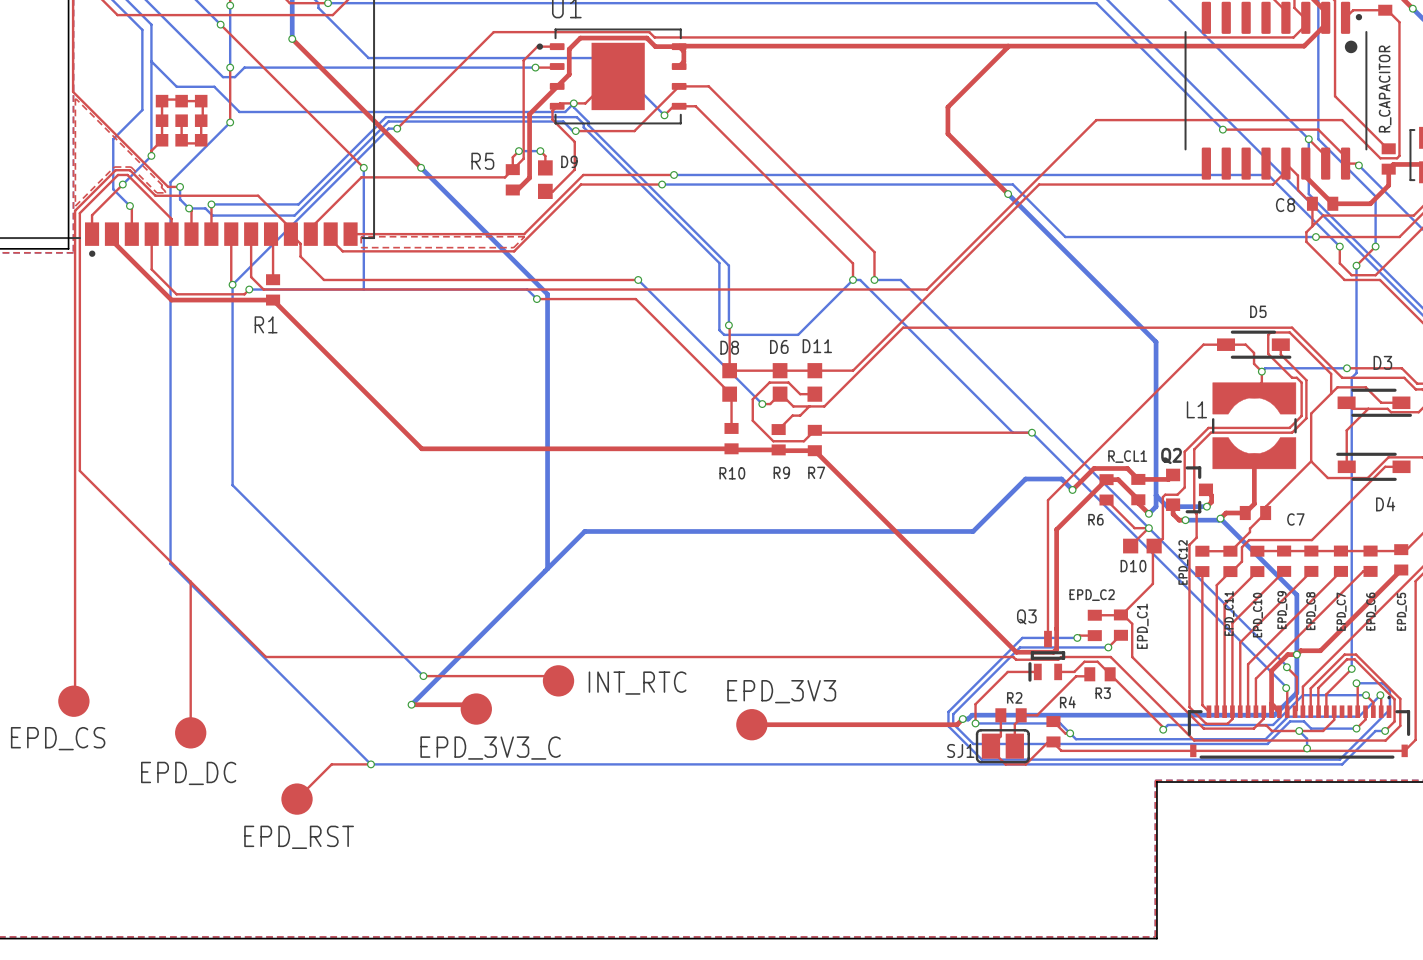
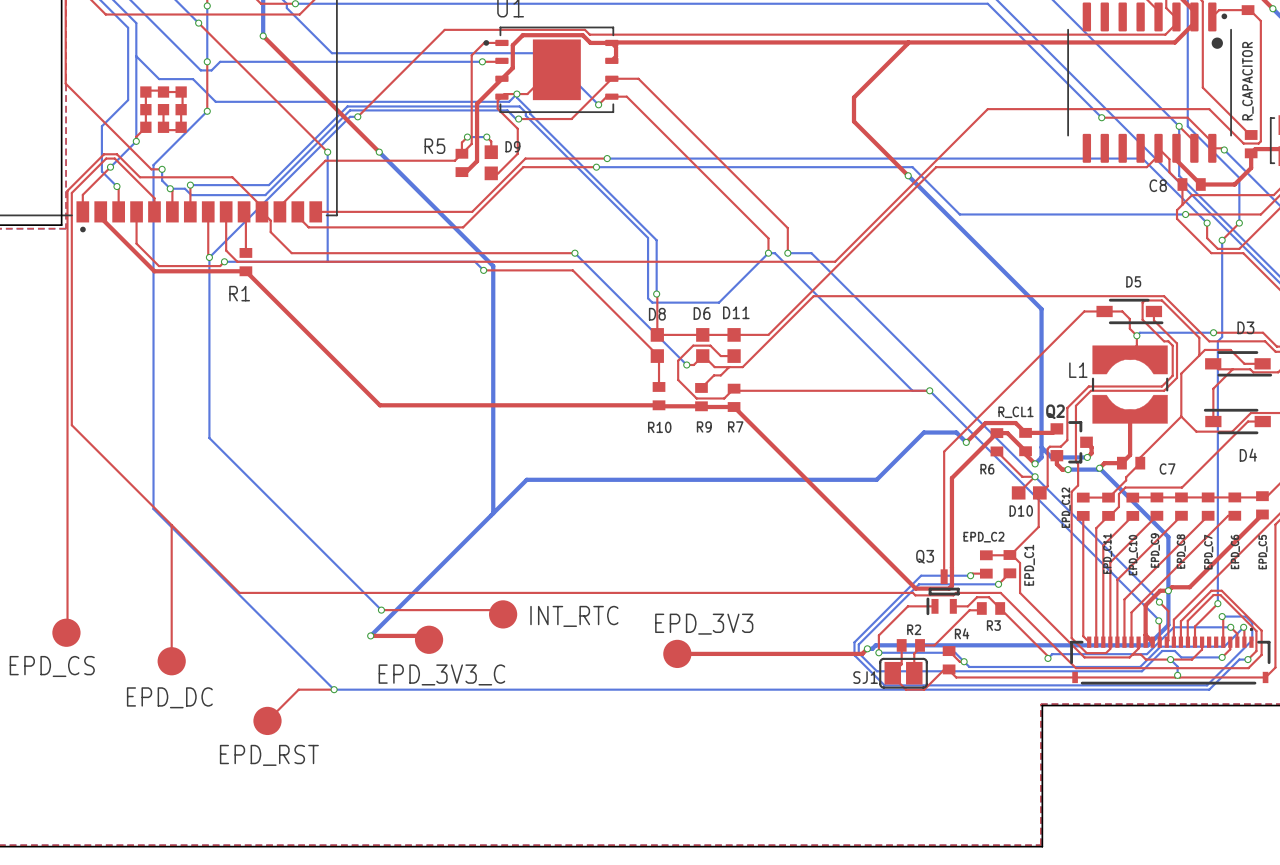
top zone outline: (75, 98) (162, 185) (161, 187) (165, 192) (156, 192) (131, 167) (114, 167) (75, 206) (75, 98) -> none
top zone outline: (361, 236) (524, 236) (513, 247) (361, 247) (361, 236) -> none

